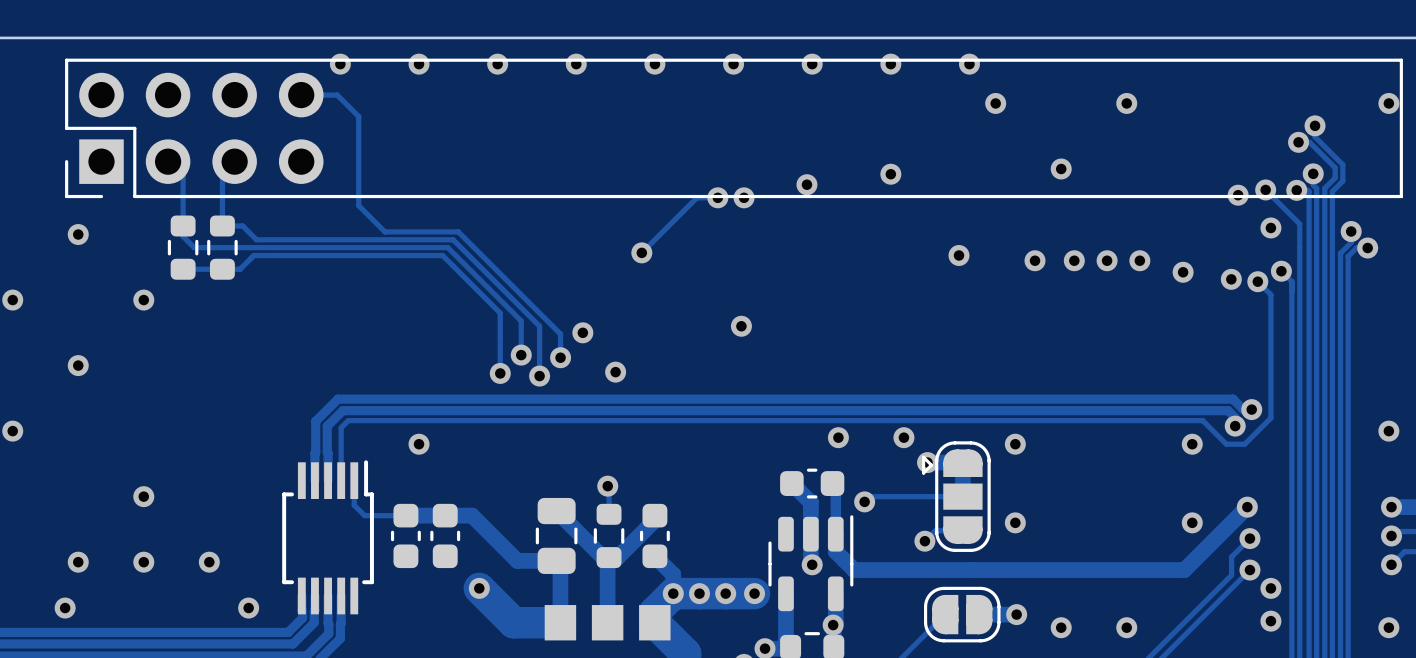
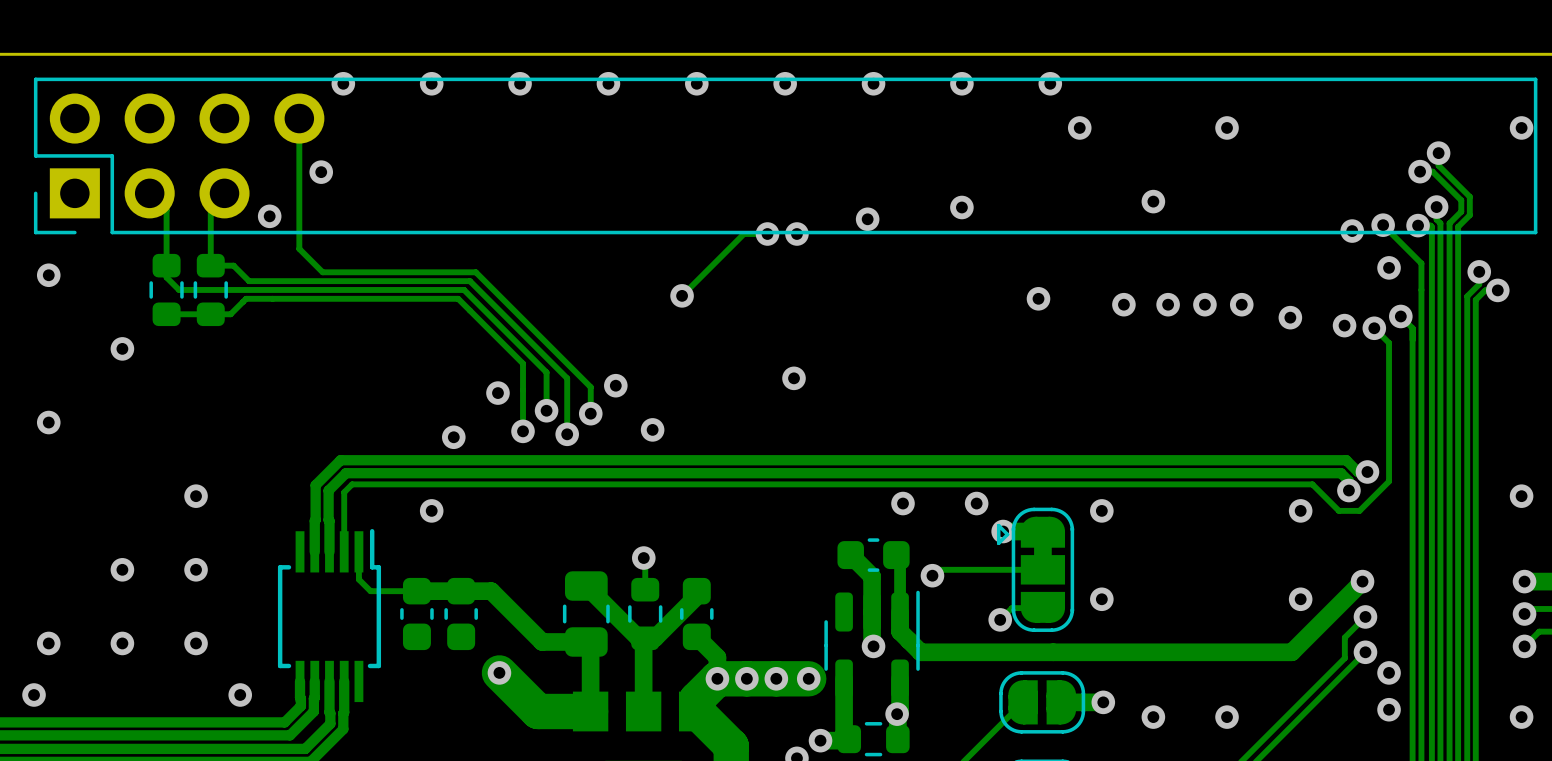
part footprint: [65, 58, 1403, 199] -> [33, 77, 1538, 235]
track: (301, 95) (337, 95) (358, 116) (358, 205) (384, 231) -> (299, 118) (299, 248) (322, 272) (393, 272)
via: none -> (321, 172)
via: none -> (269, 216)
via: none -> (497, 393)
via: none -> (453, 437)
via: none -> (196, 496)
via: none -> (196, 569)

